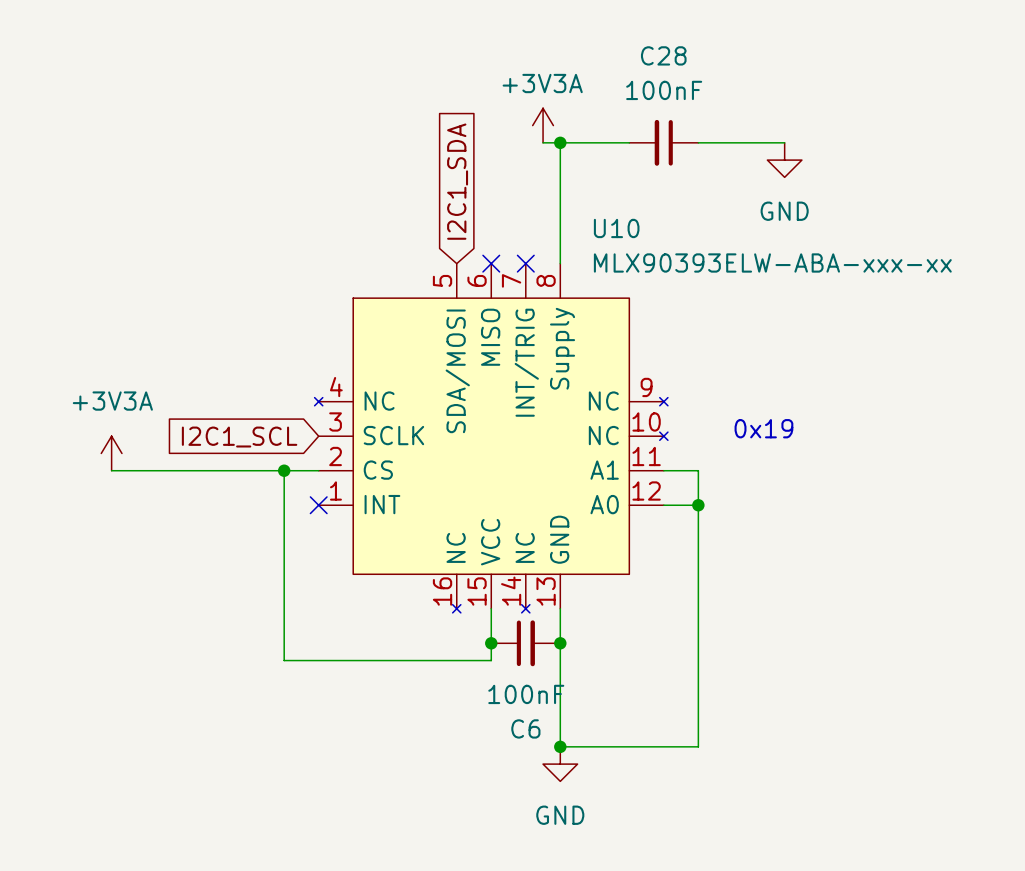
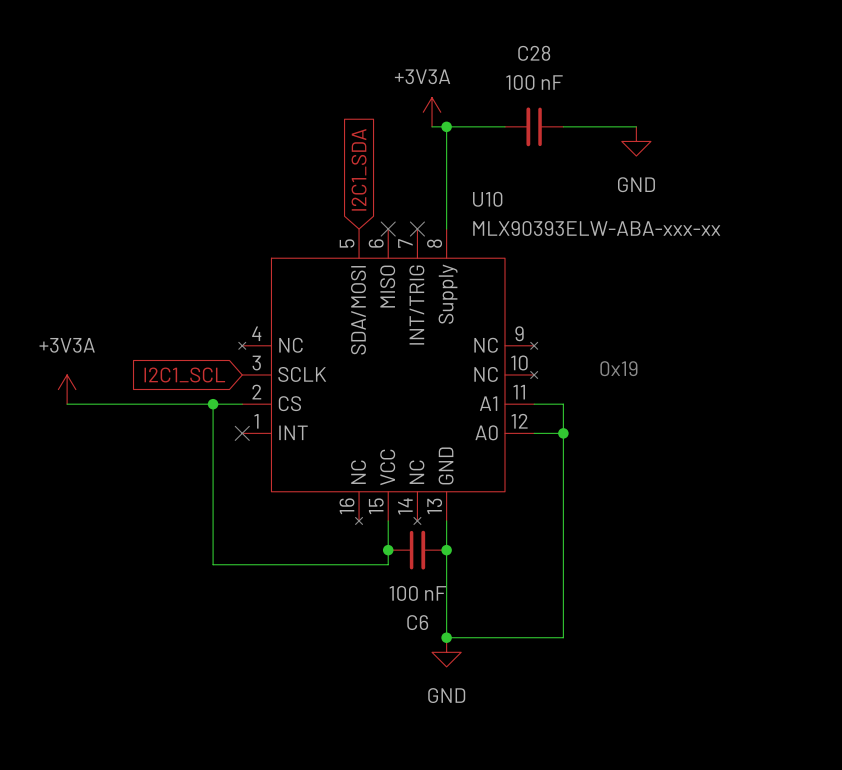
C28 value: 100nF (664, 90) -> 100 nF (534, 82)
C6 value: 100nF (526, 694) -> 100 nF (417, 593)

